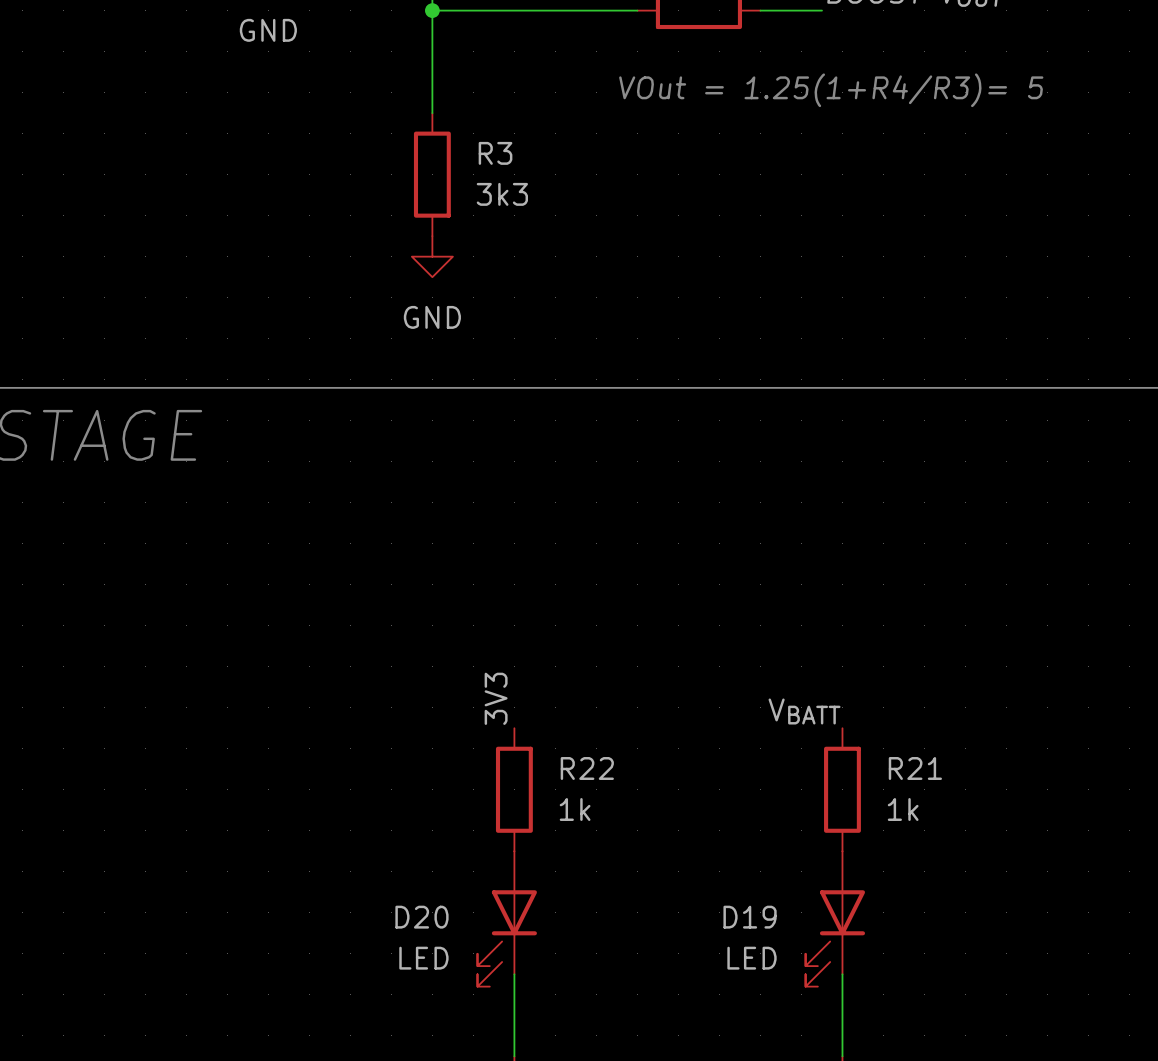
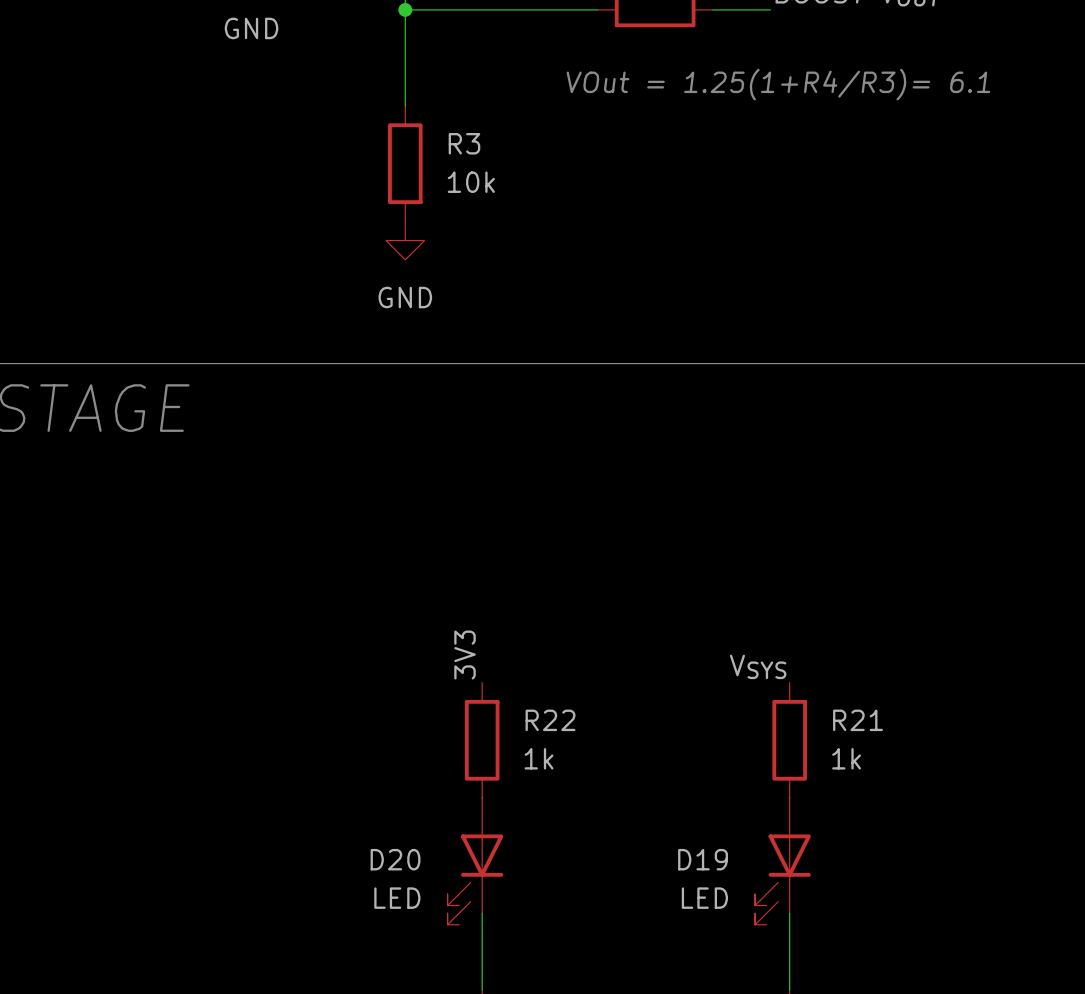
text: VOut = 1.25(1+R4/R3)= 5 (831, 90) -> VOut = 1.25(1+R4/R3)= 6.1 (778, 84)
R3 value: 3k3 (502, 194) -> 10k (471, 182)
label: VBATT (804, 711) -> VSYS (758, 666)

